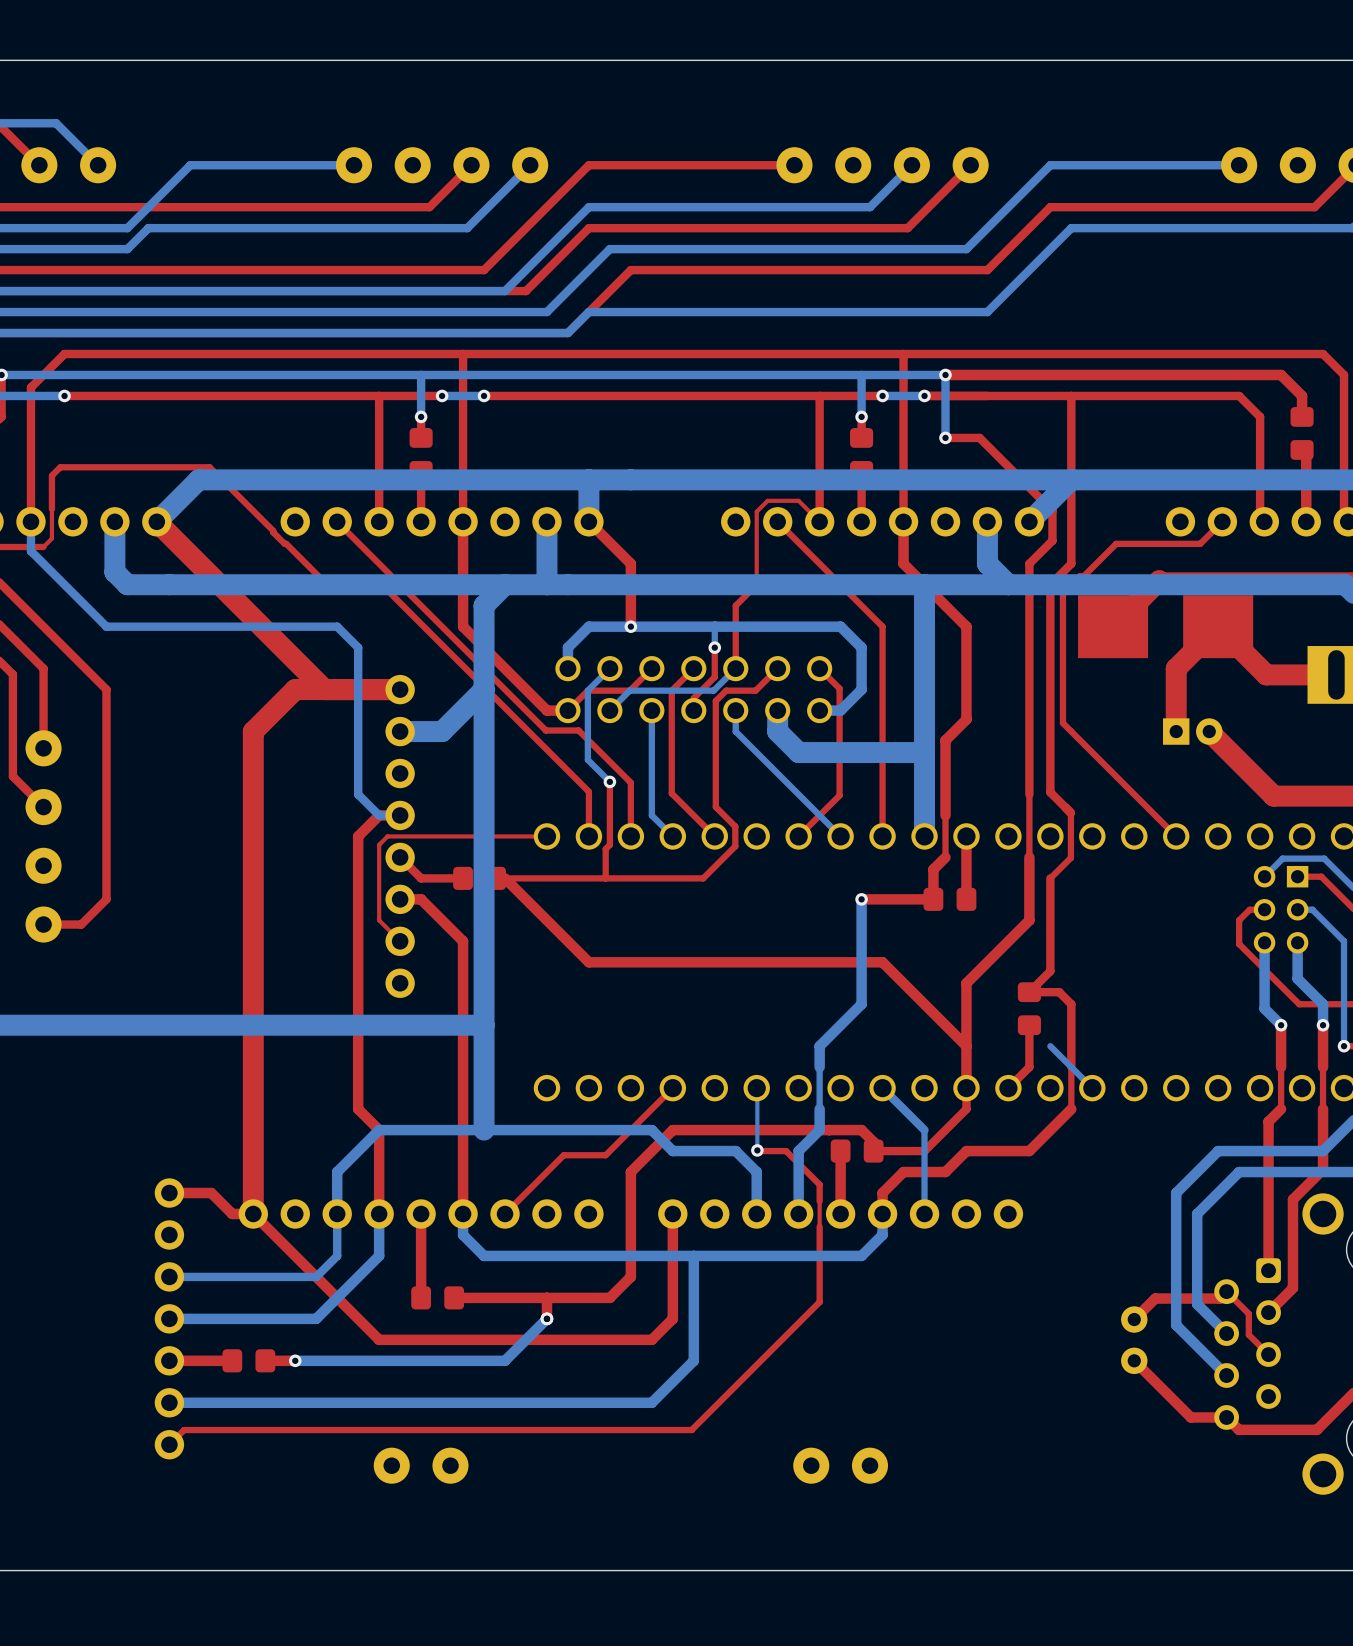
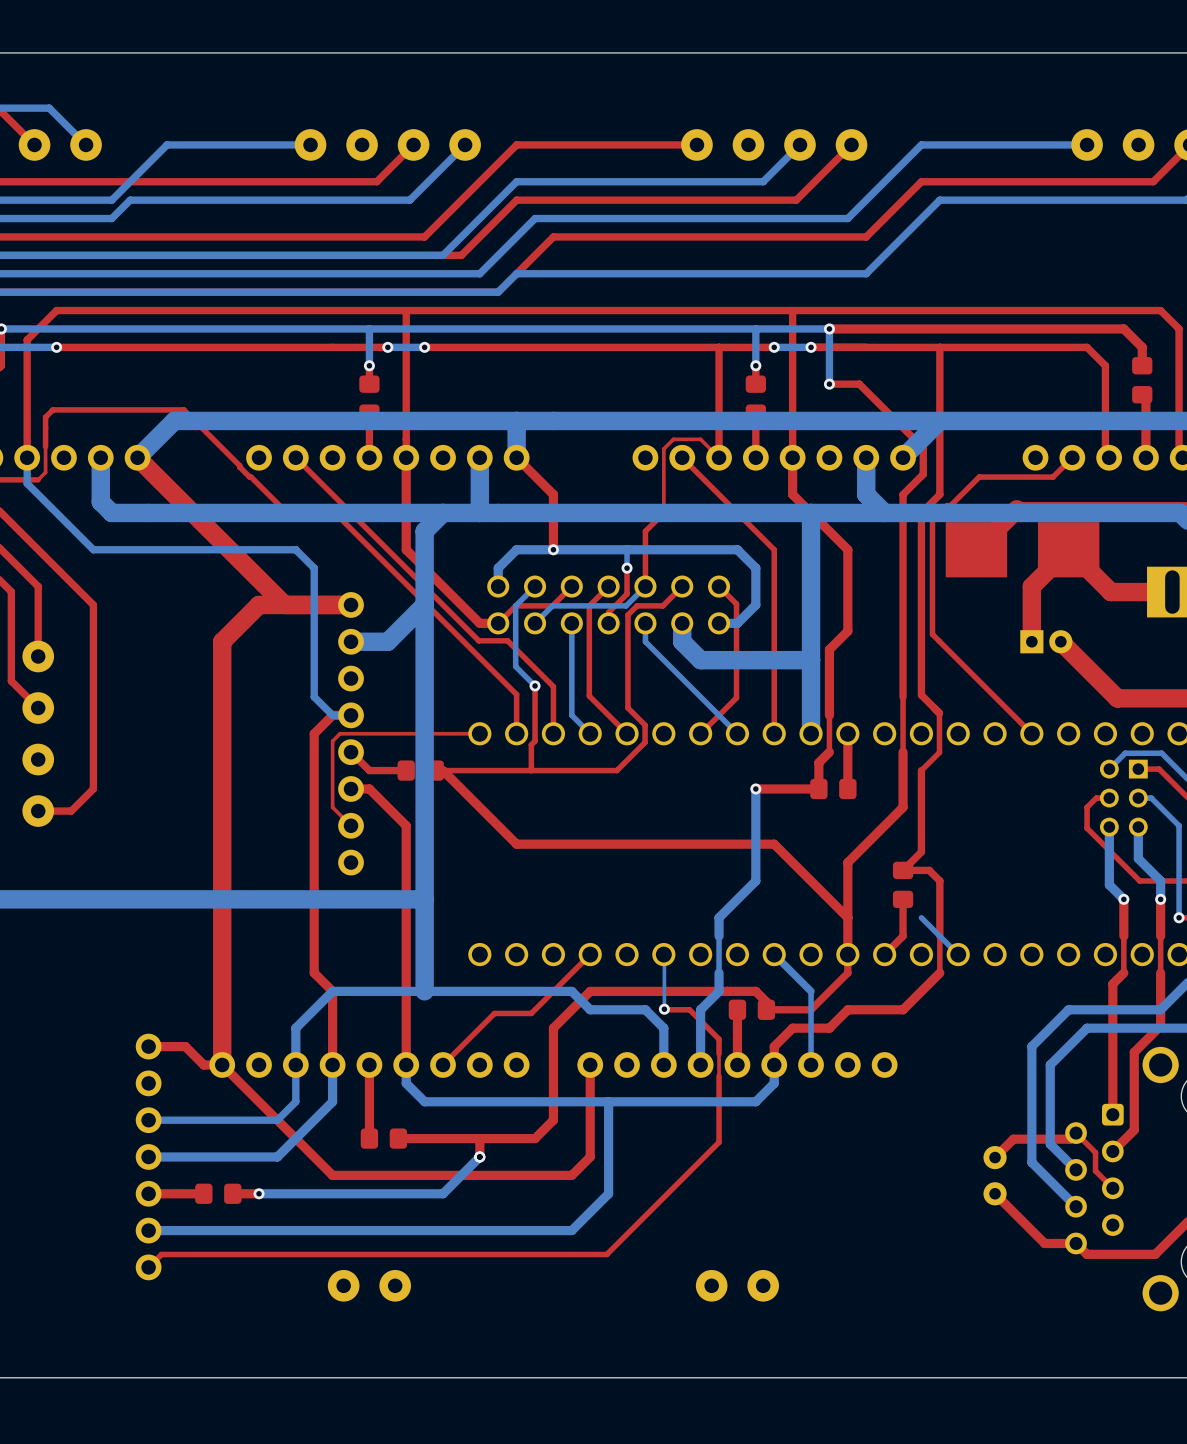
top track: (379, 395) (379, 521) -> none

